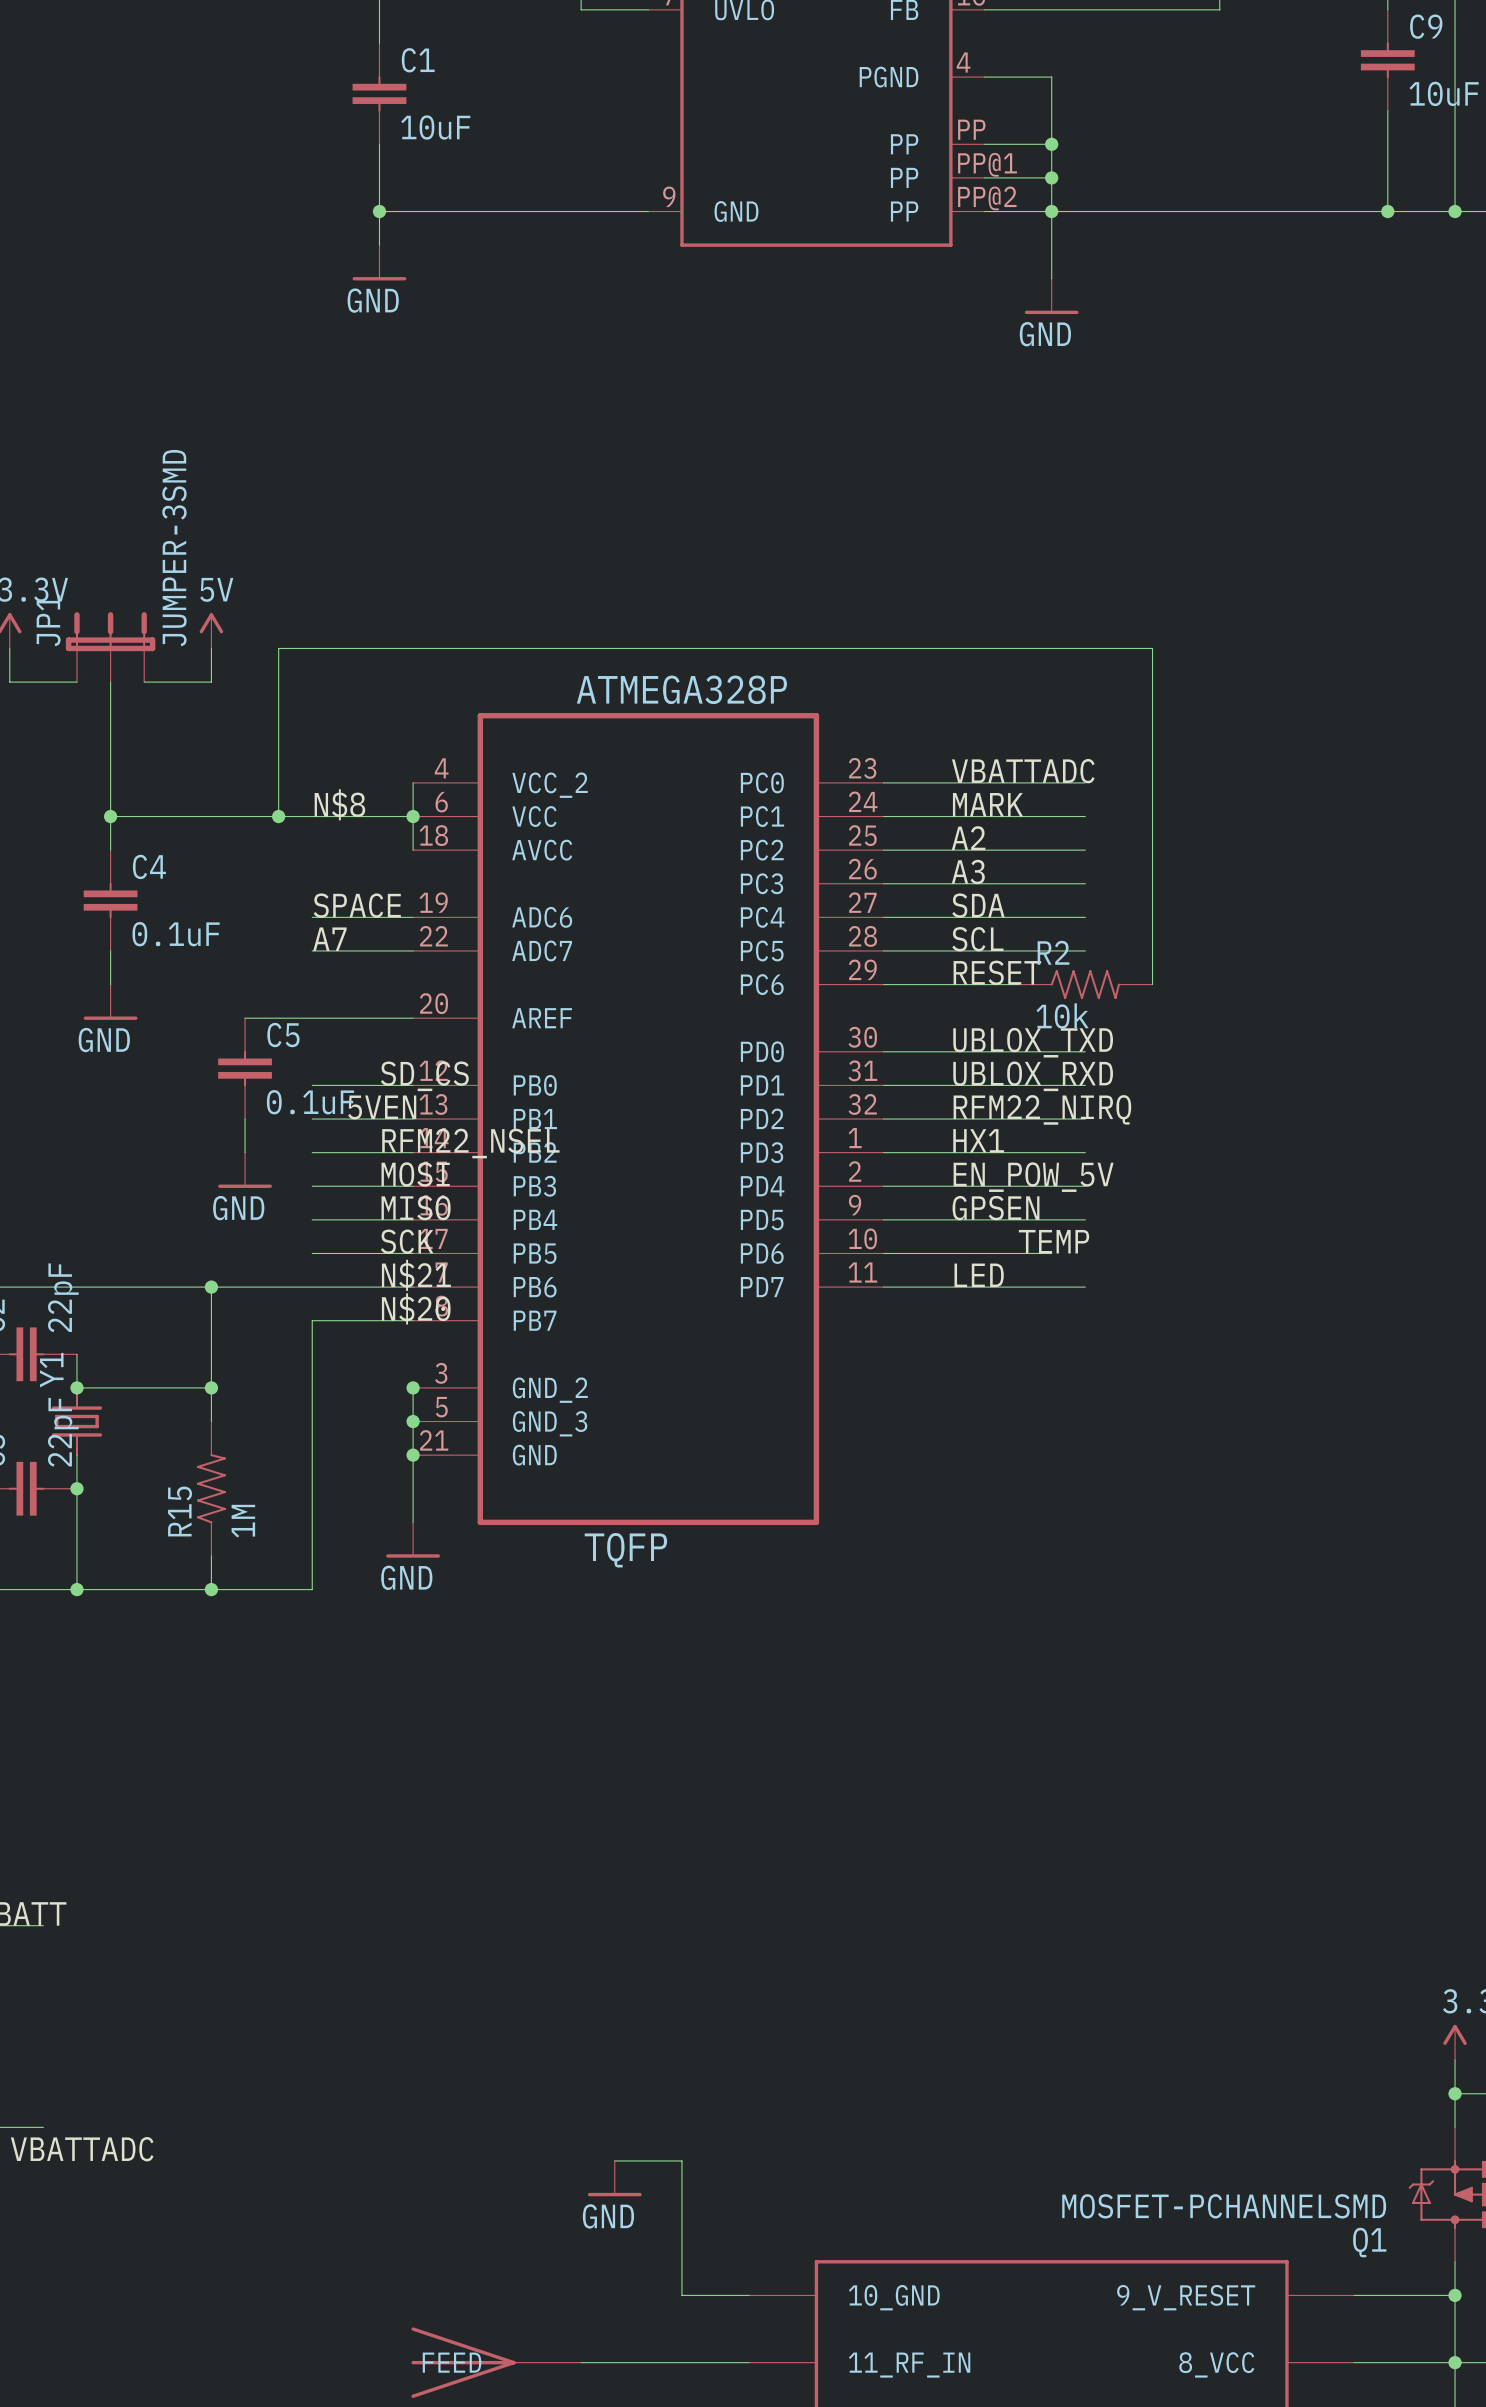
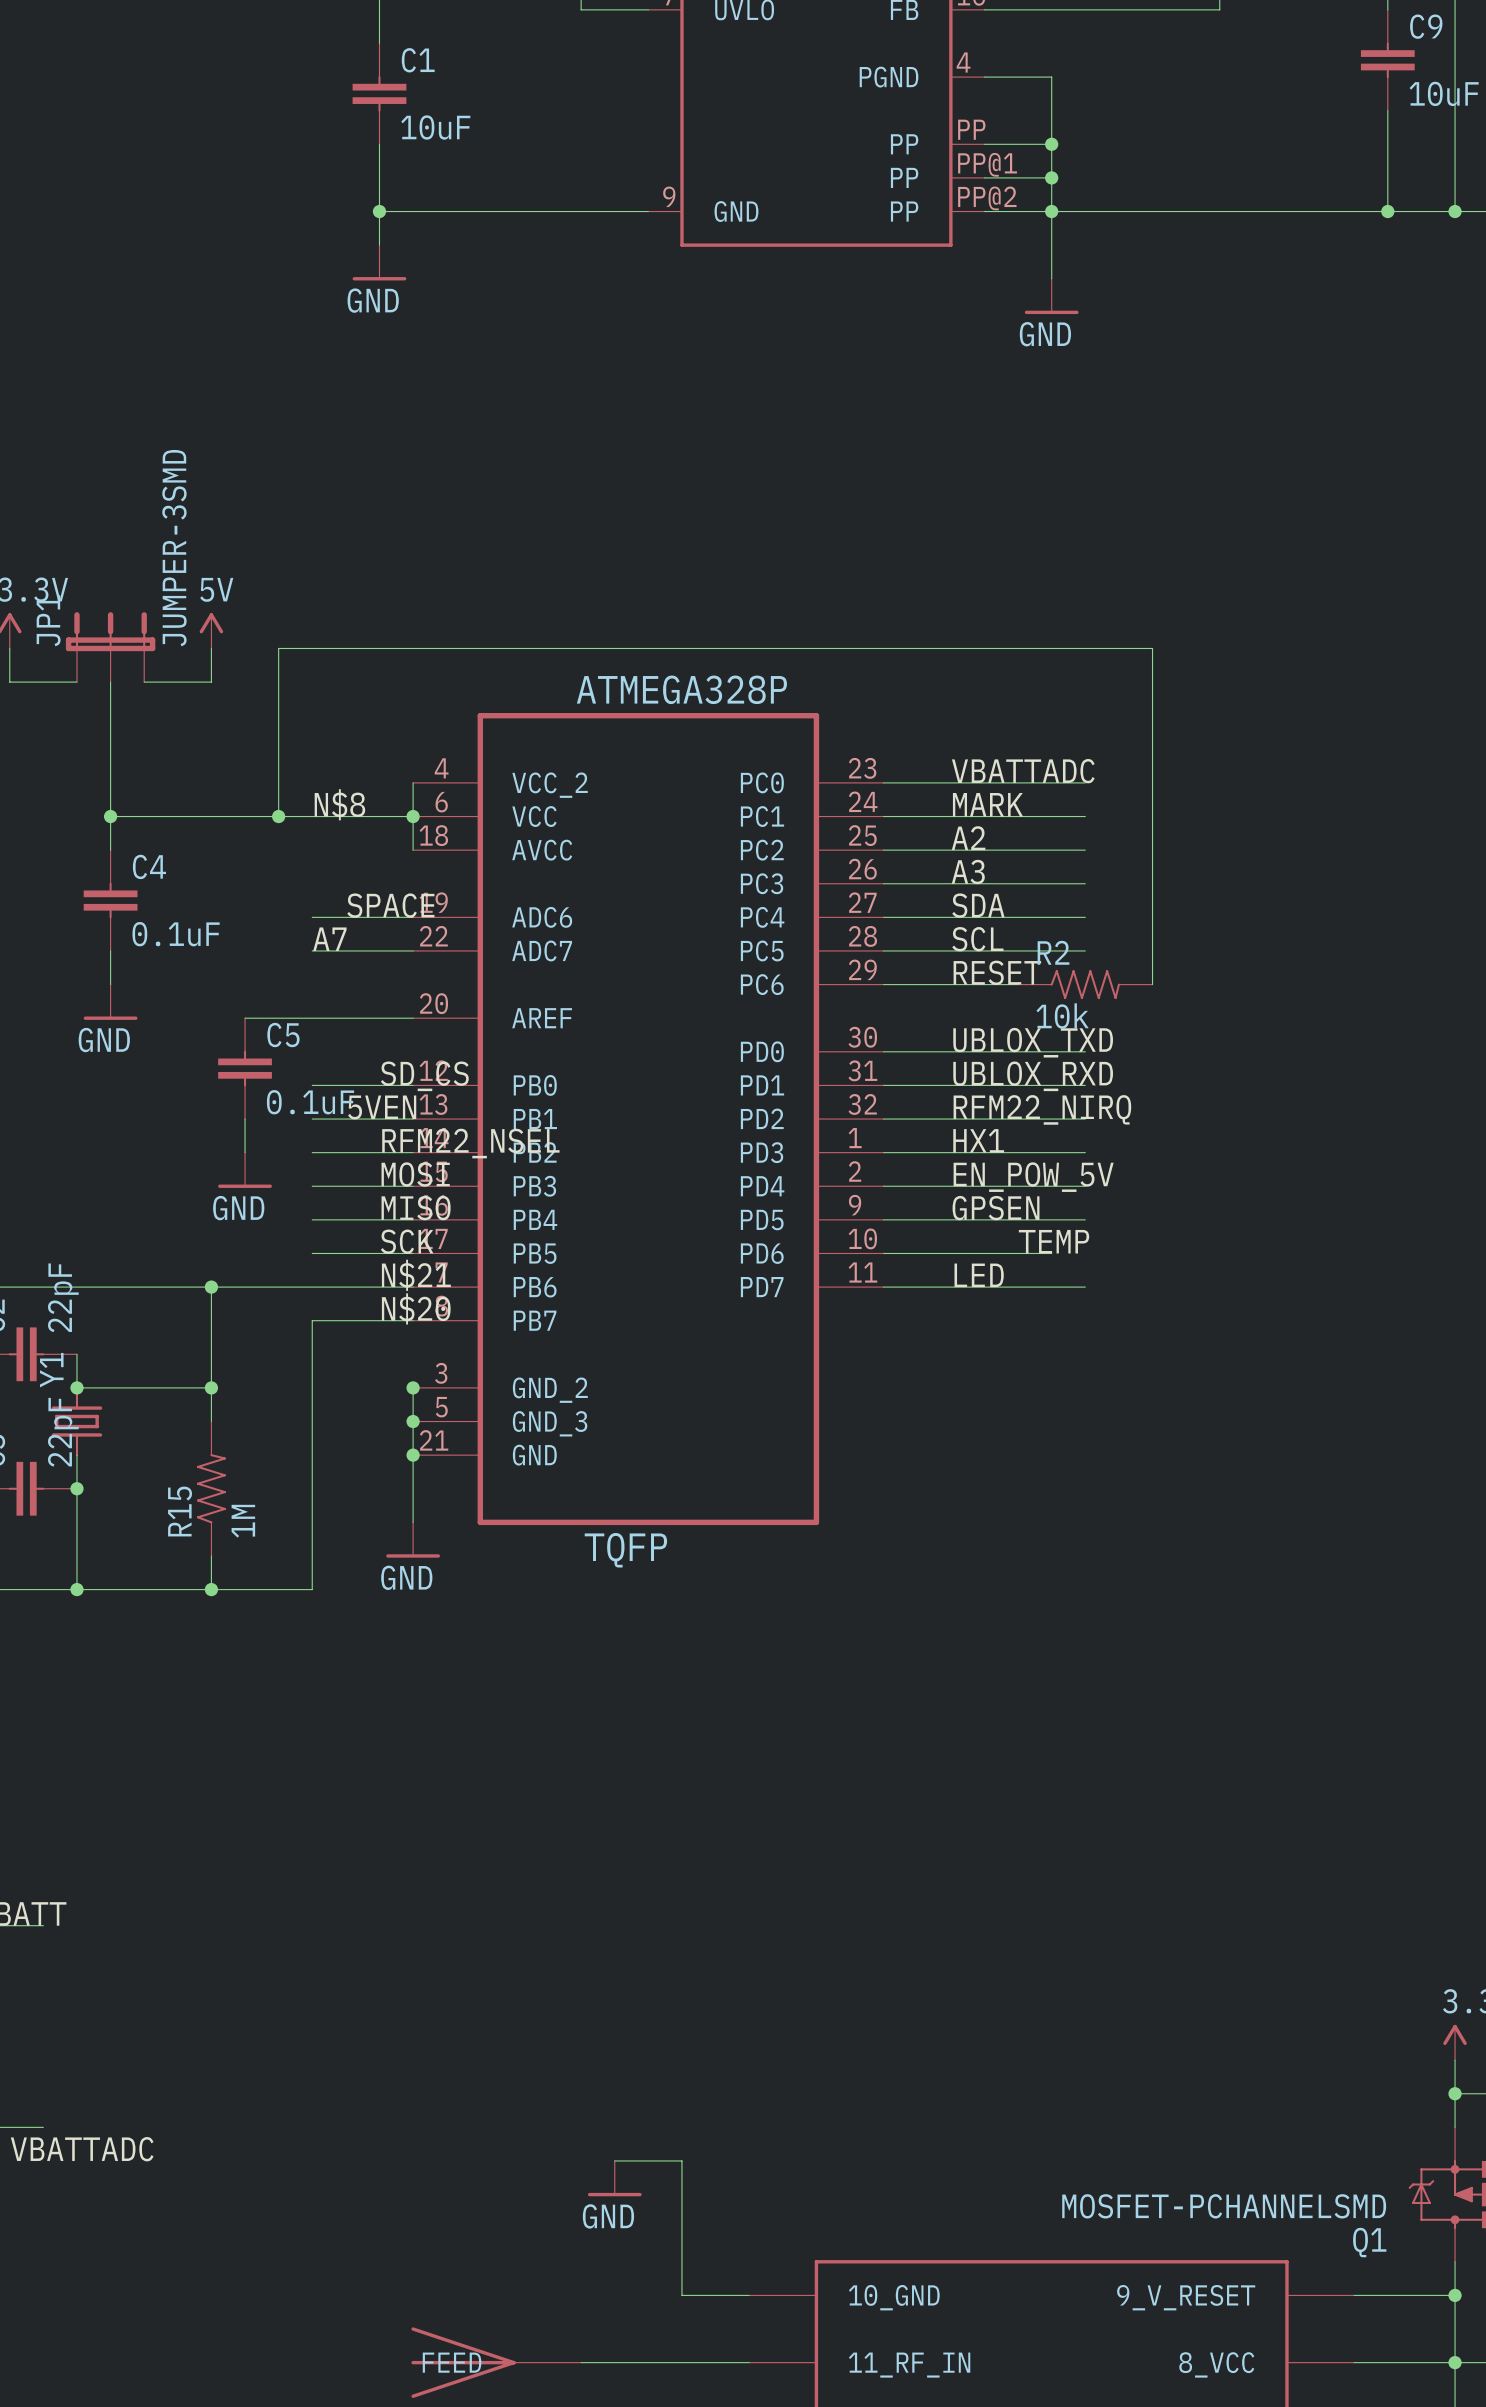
label position: SPACE (357, 905) -> SPACE (390, 905)

